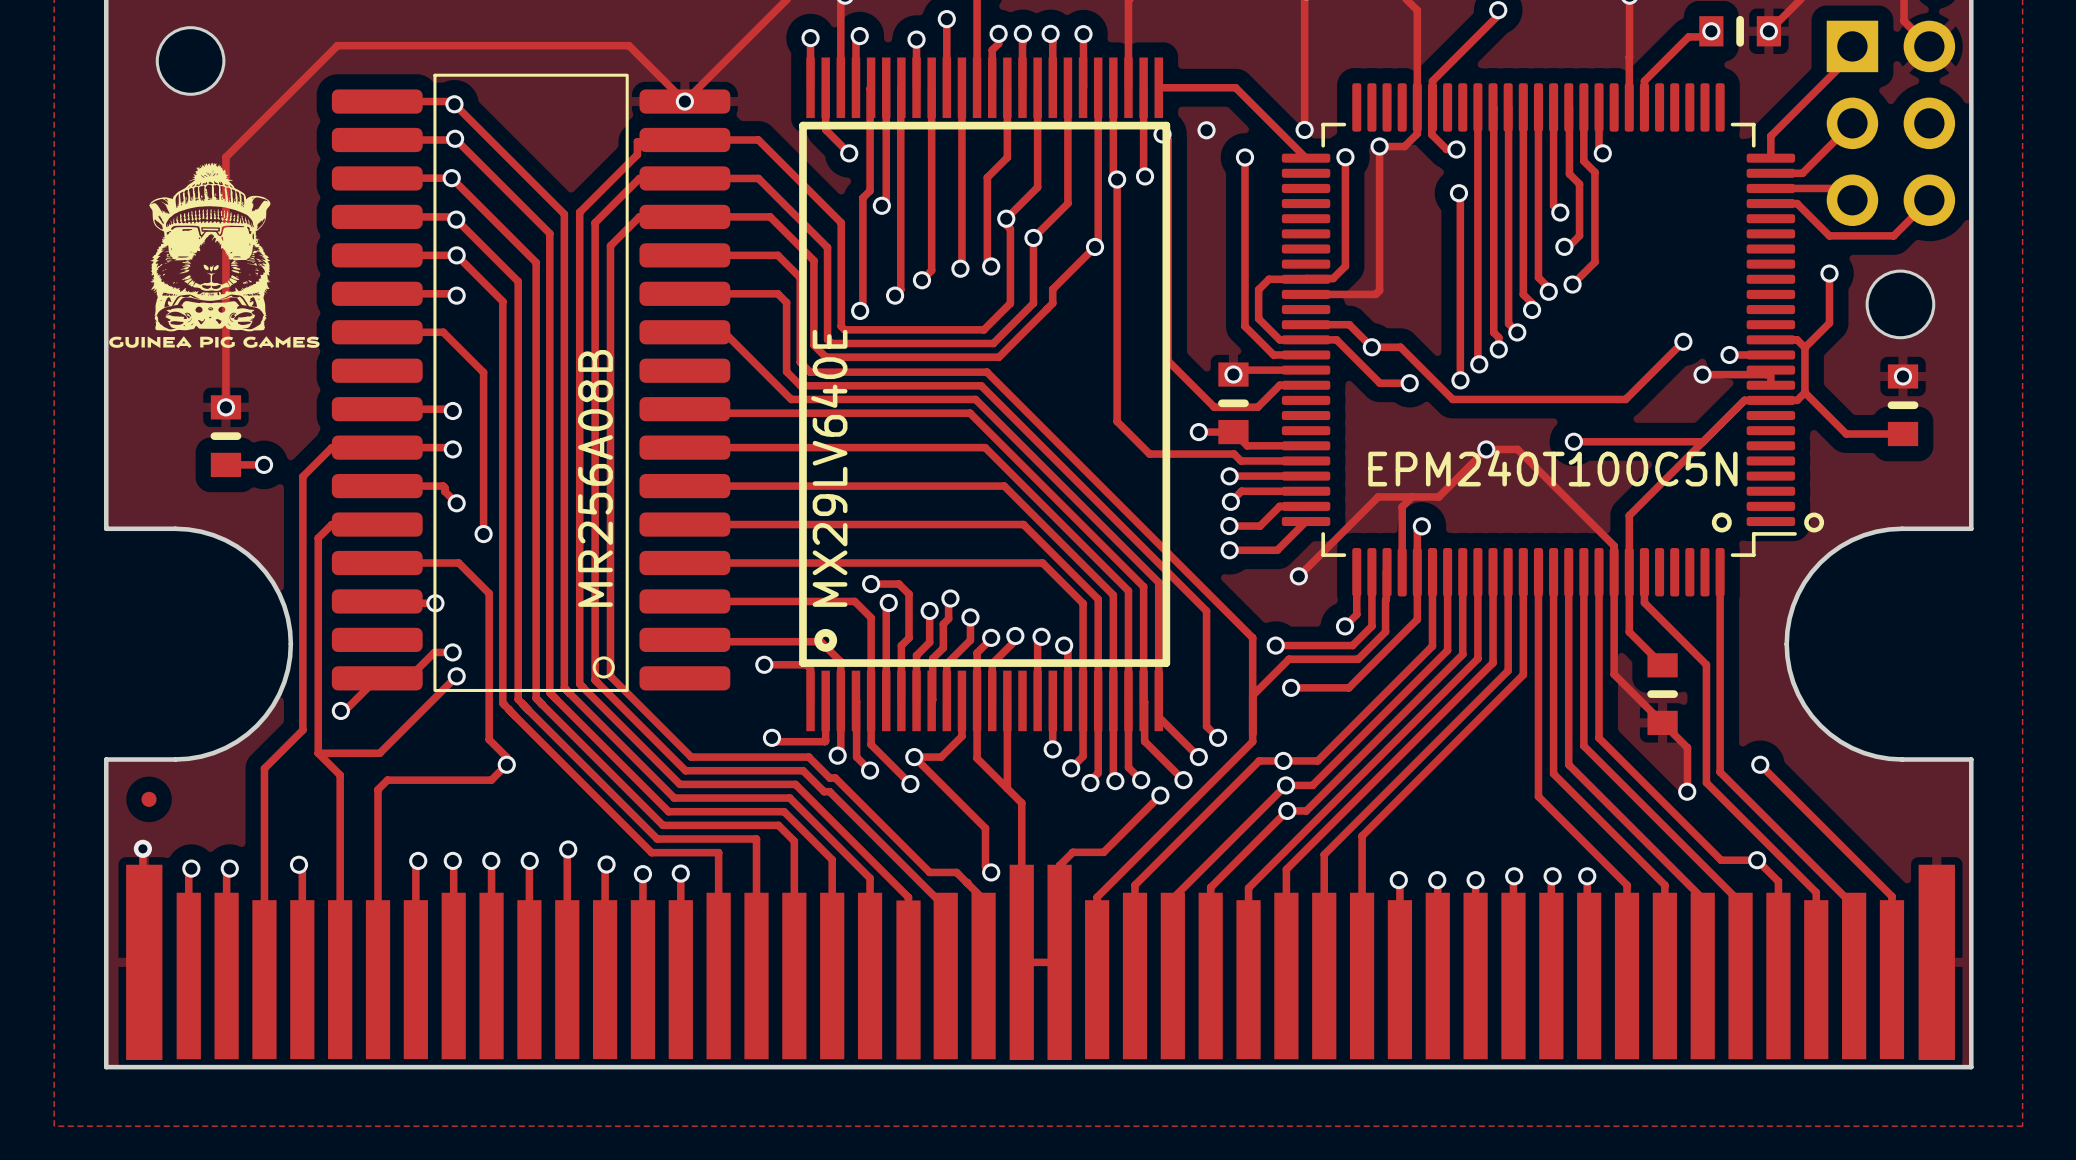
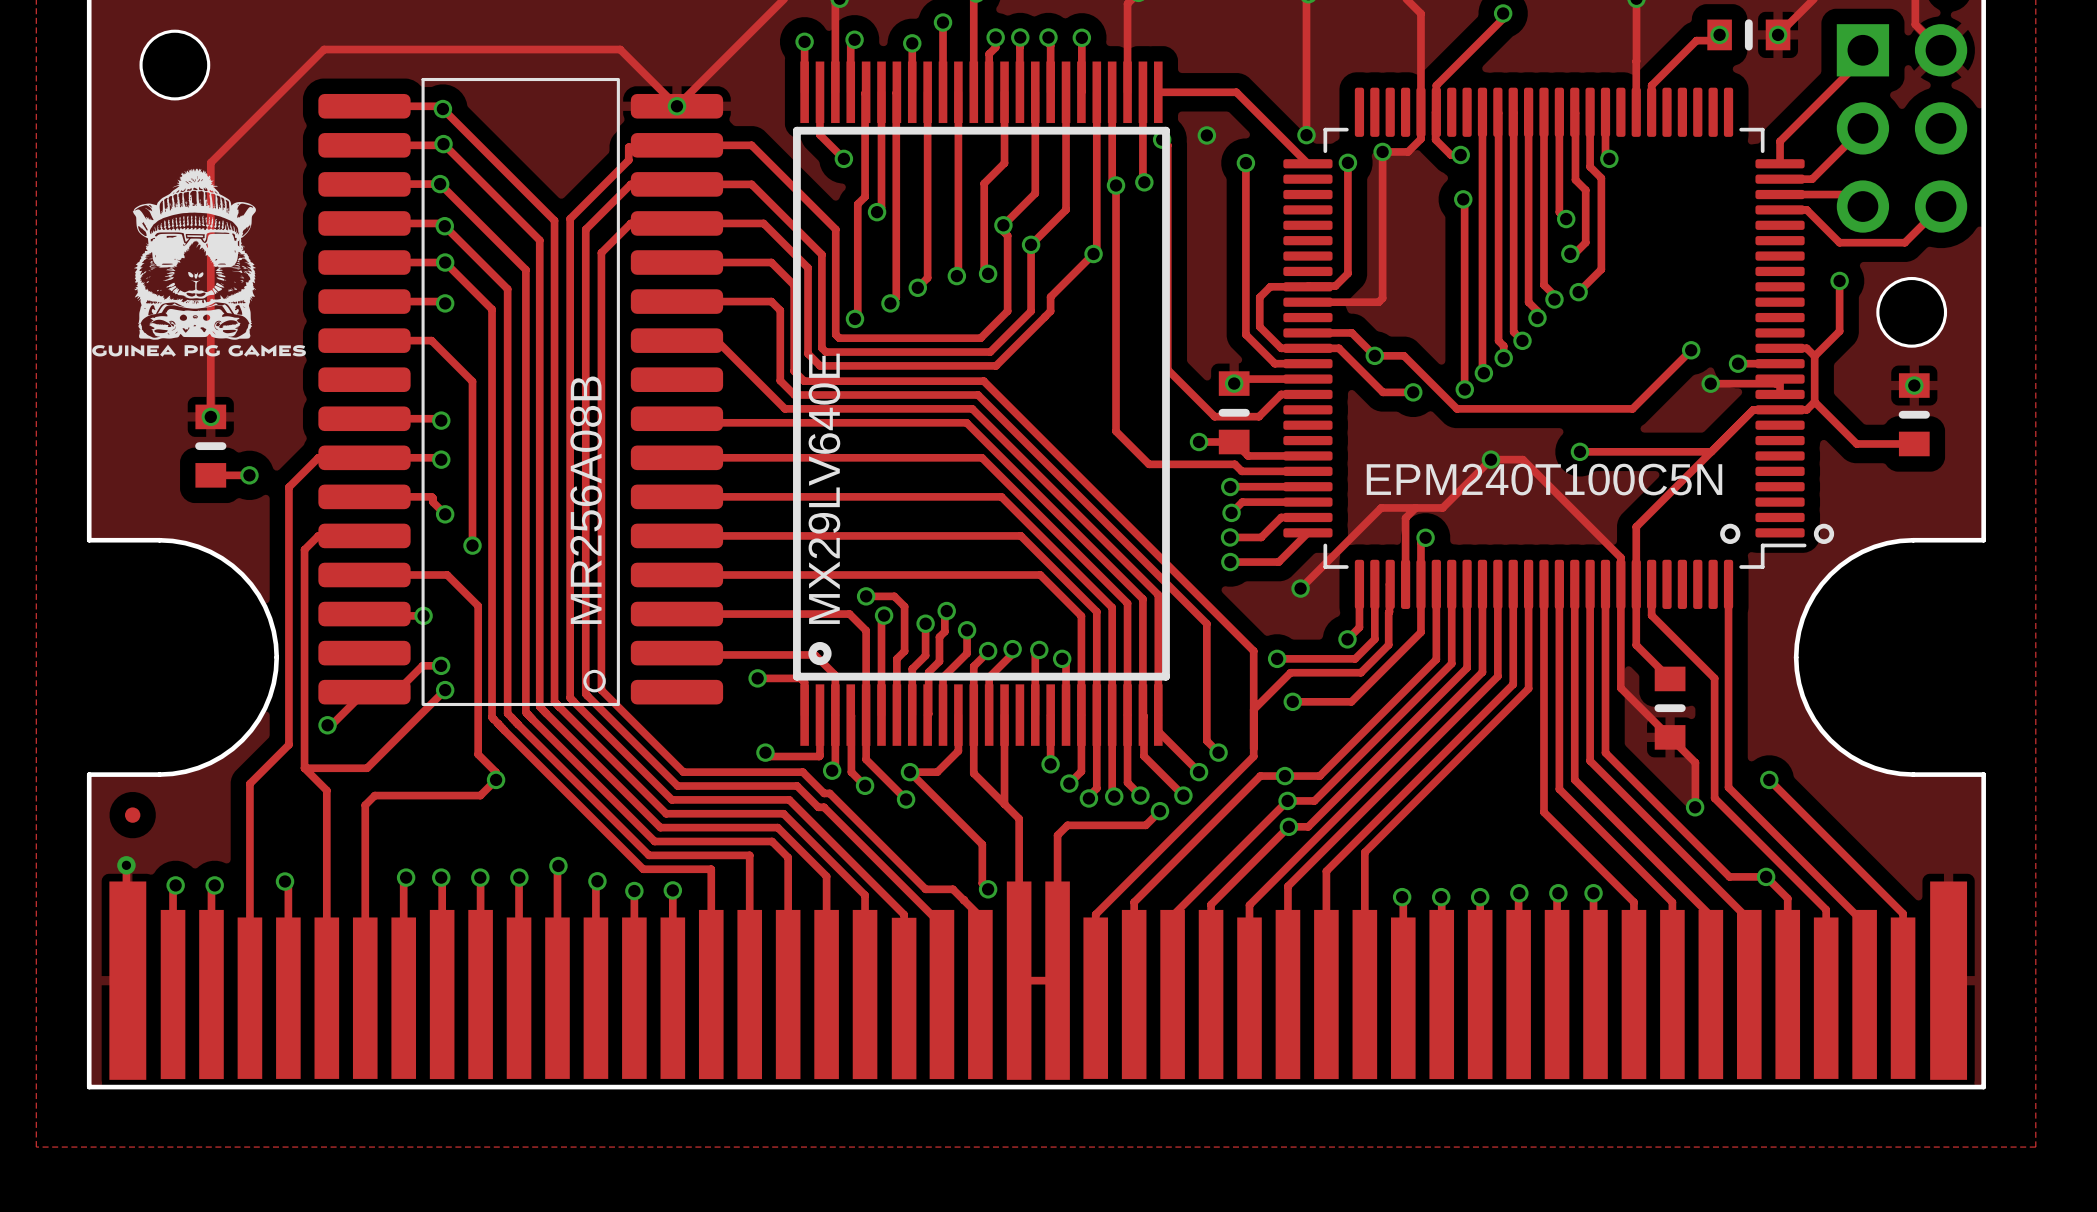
track: (1146, 809) (1103, 852) (1072, 852) (1059, 865) -> (1145, 825) (1067, 825) (1057, 835) (1057, 882)

